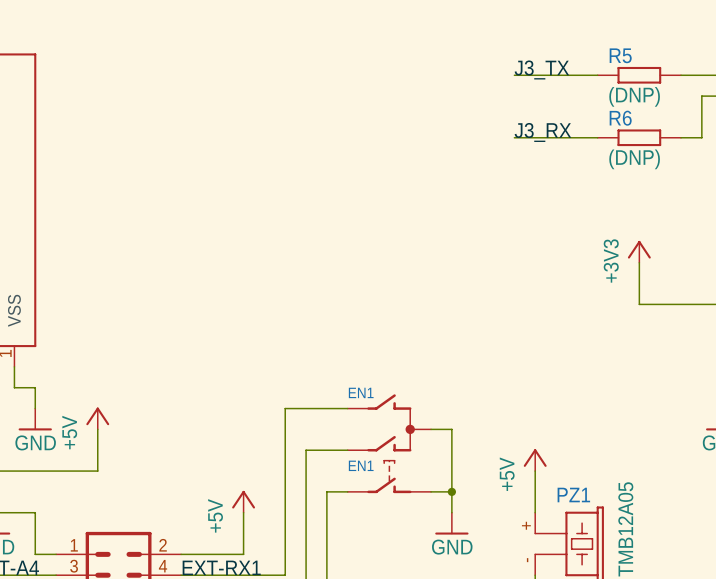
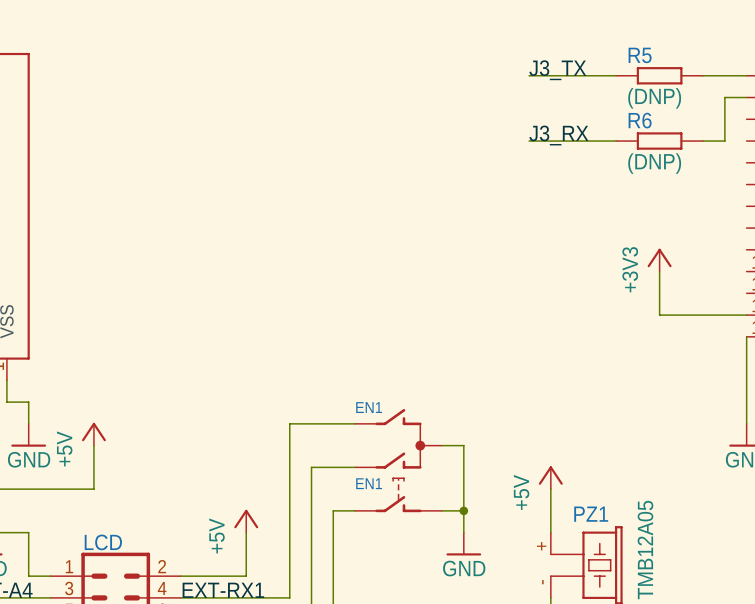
LCD name: none -> LCD (103, 542)

